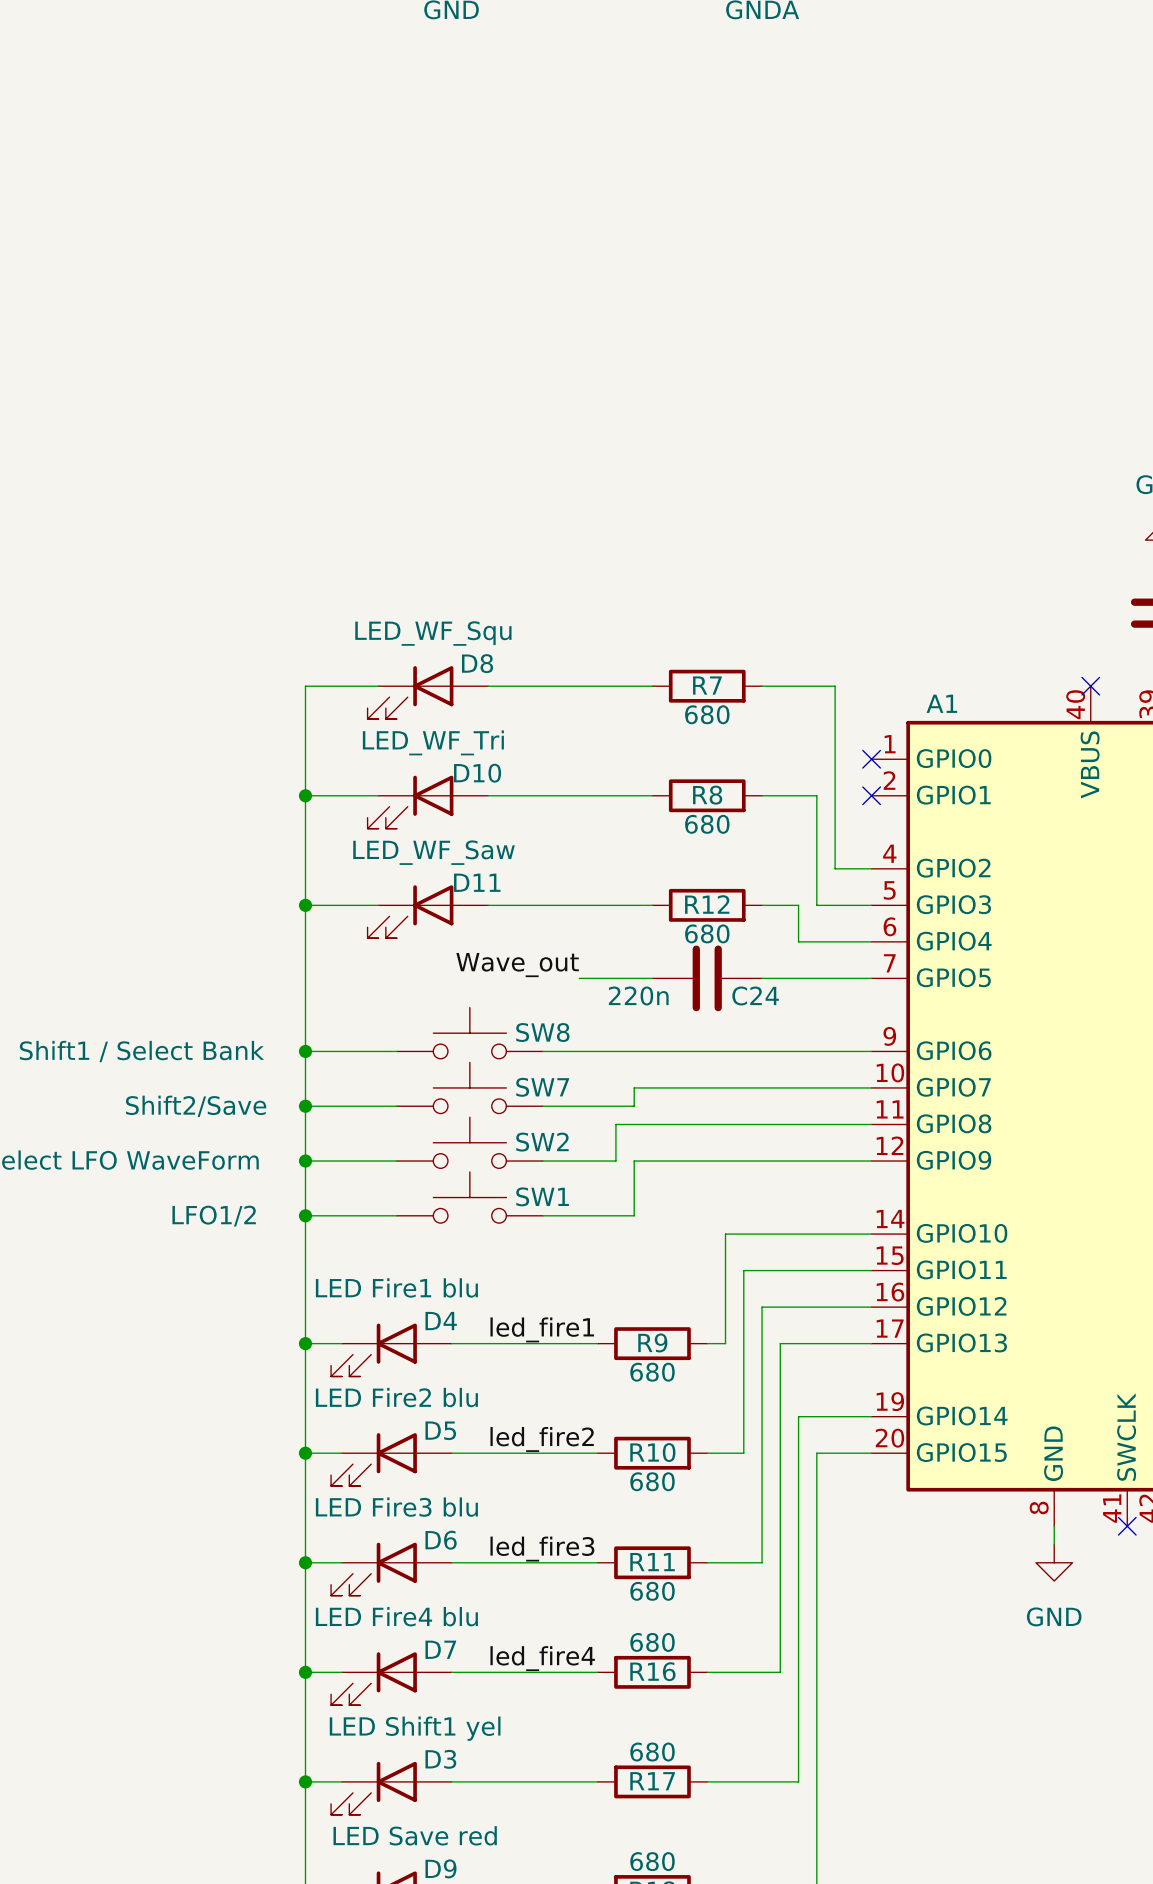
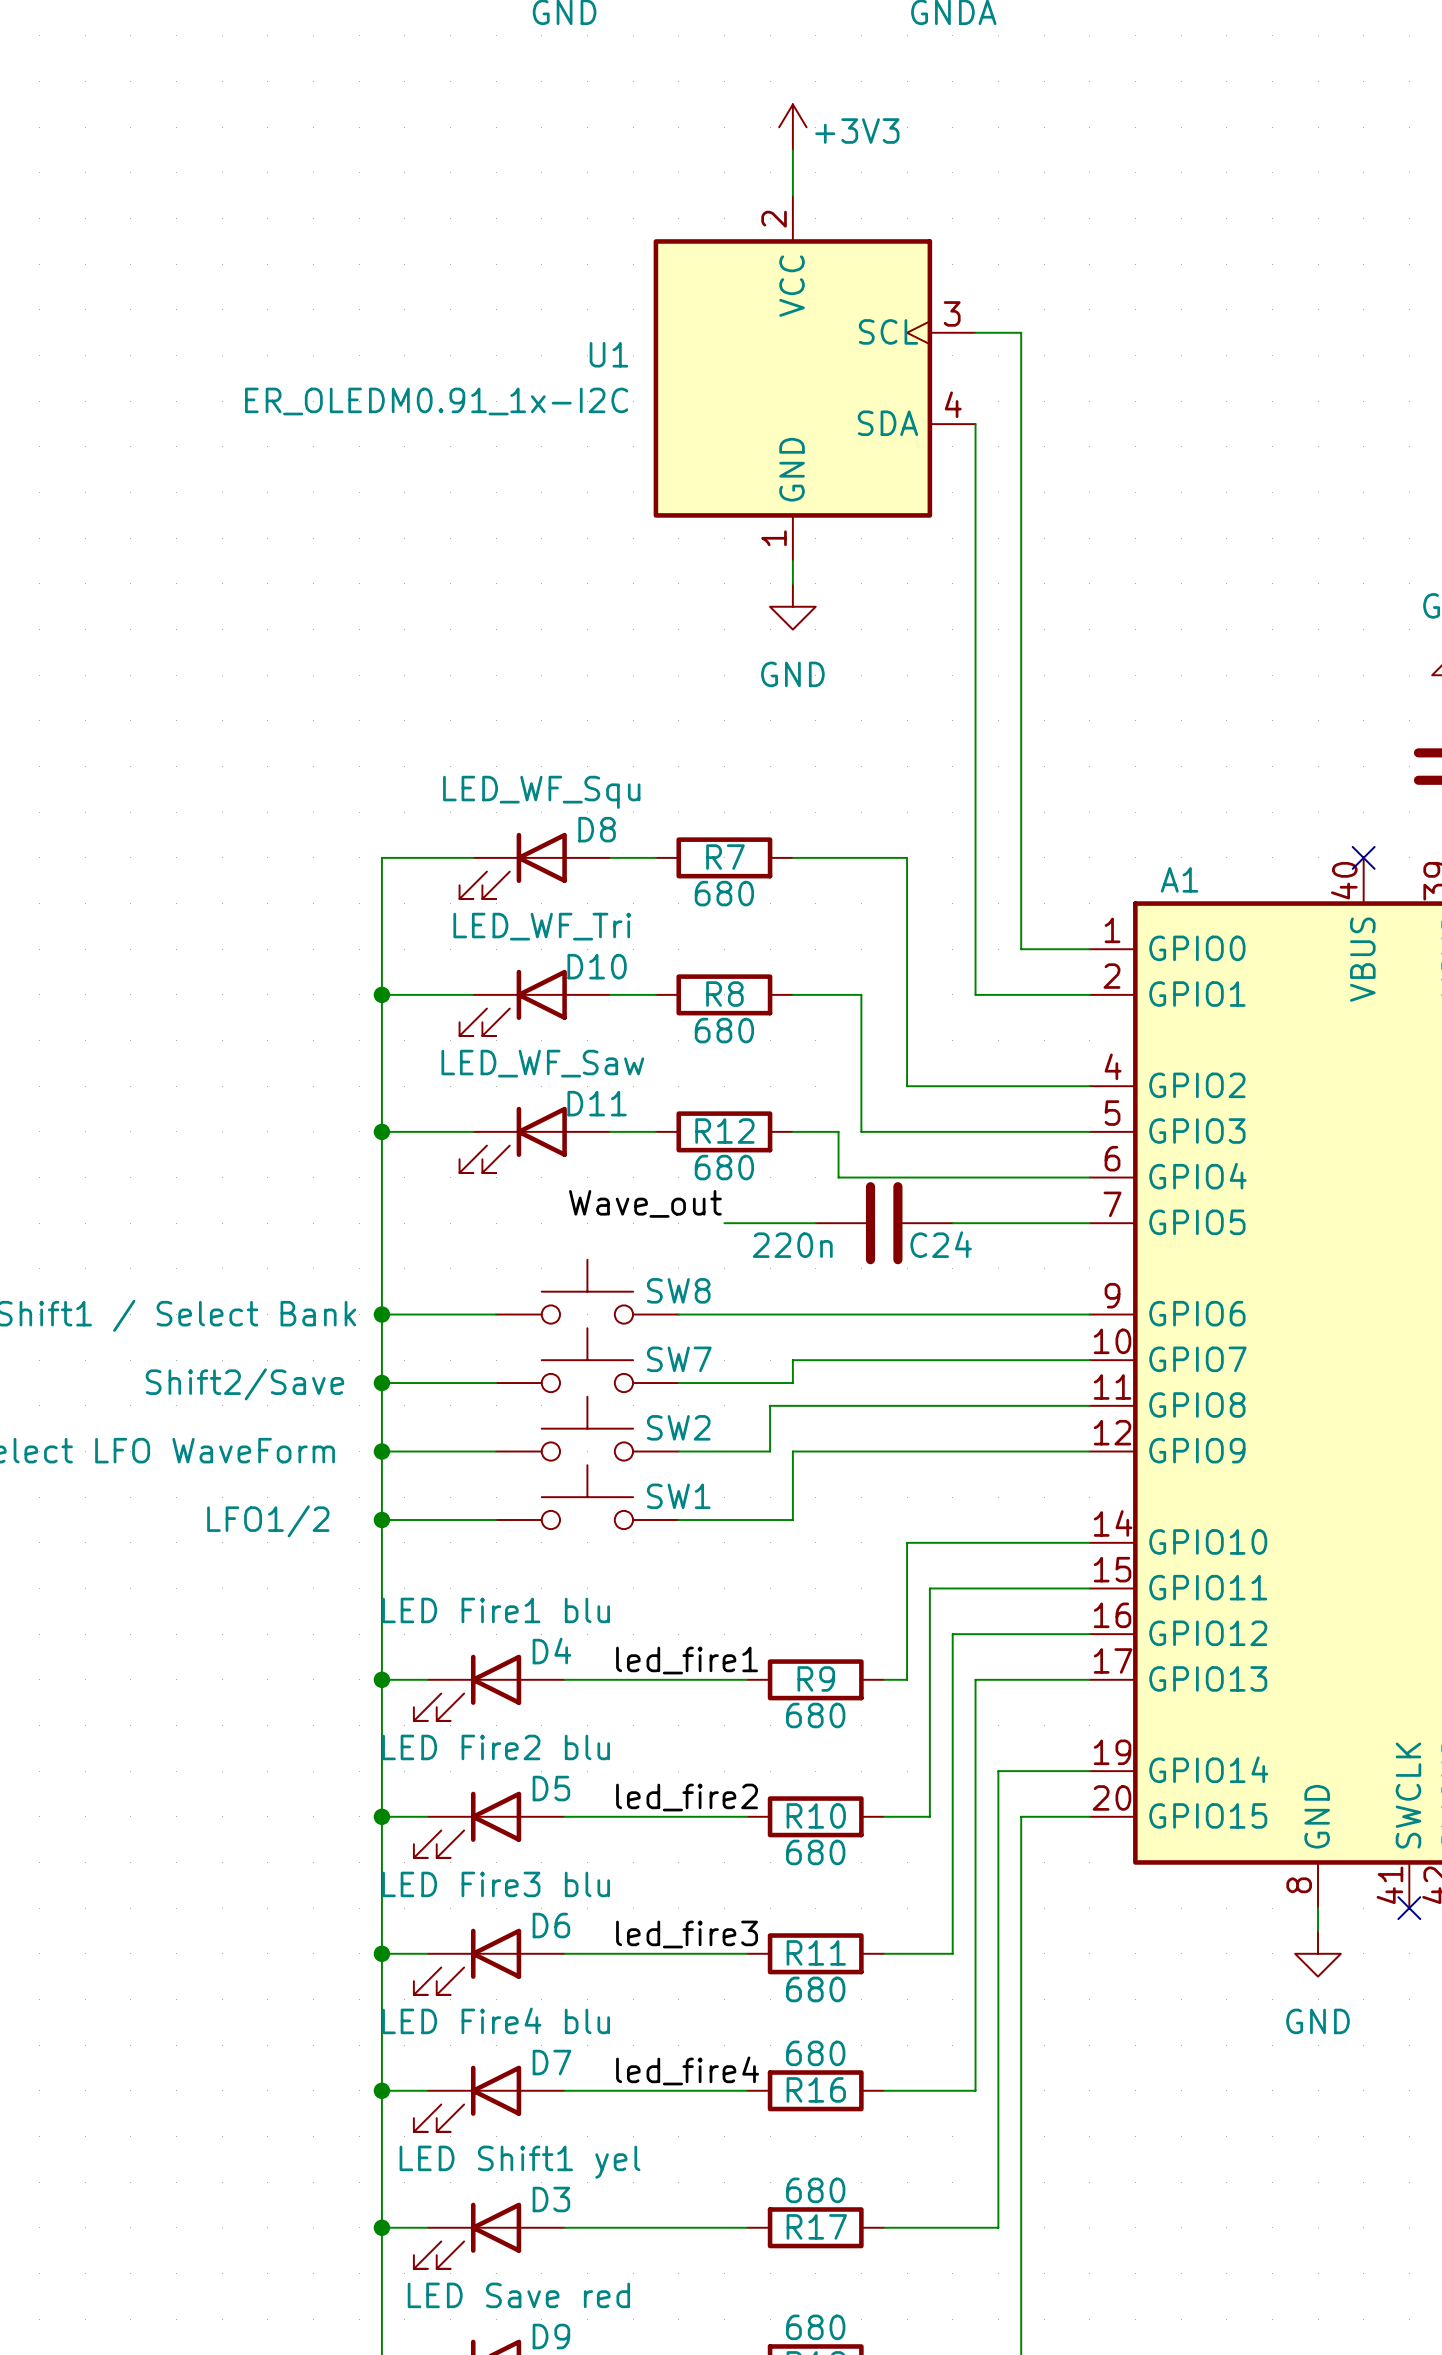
power symbol: none -> +3V3 (792, 127)
wire: none -> (792, 150) (792, 195)
wire: none -> (975, 332) (1021, 332) (1021, 949) (1089, 949)
U1: none -> ER_OLEDM0.91_1x-I2C (814, 378)
wire: none -> (792, 561) (792, 583)
power symbol: none -> GND (792, 606)
wire: (524, 686) (634, 686) -> none
R7 position: (707, 686) -> (724, 857)
wire: (762, 686) (835, 686) (835, 868) -> (815, 857) (907, 857) (907, 1086) (1044, 1086)
no-connect mark: (871, 759) -> none
wire: (524, 795) (634, 795) -> none
wire: none -> (815, 994) (861, 994) (861, 1131) (952, 1131)
R8 position: (707, 795) -> (724, 994)
wire: (762, 795) (780, 795) -> (975, 424) (975, 994)
wire: (816, 795) (816, 905) -> (1021, 994) (1089, 994)
no-connect mark: (871, 795) -> none
wire: (524, 905) (634, 905) -> none
wire: none -> (815, 1131) (838, 1131) (838, 1177) (998, 1177)
R12 position: (707, 905) -> (724, 1131)
wire: (798, 905) (798, 941) -> (998, 1131) (1021, 1131)

